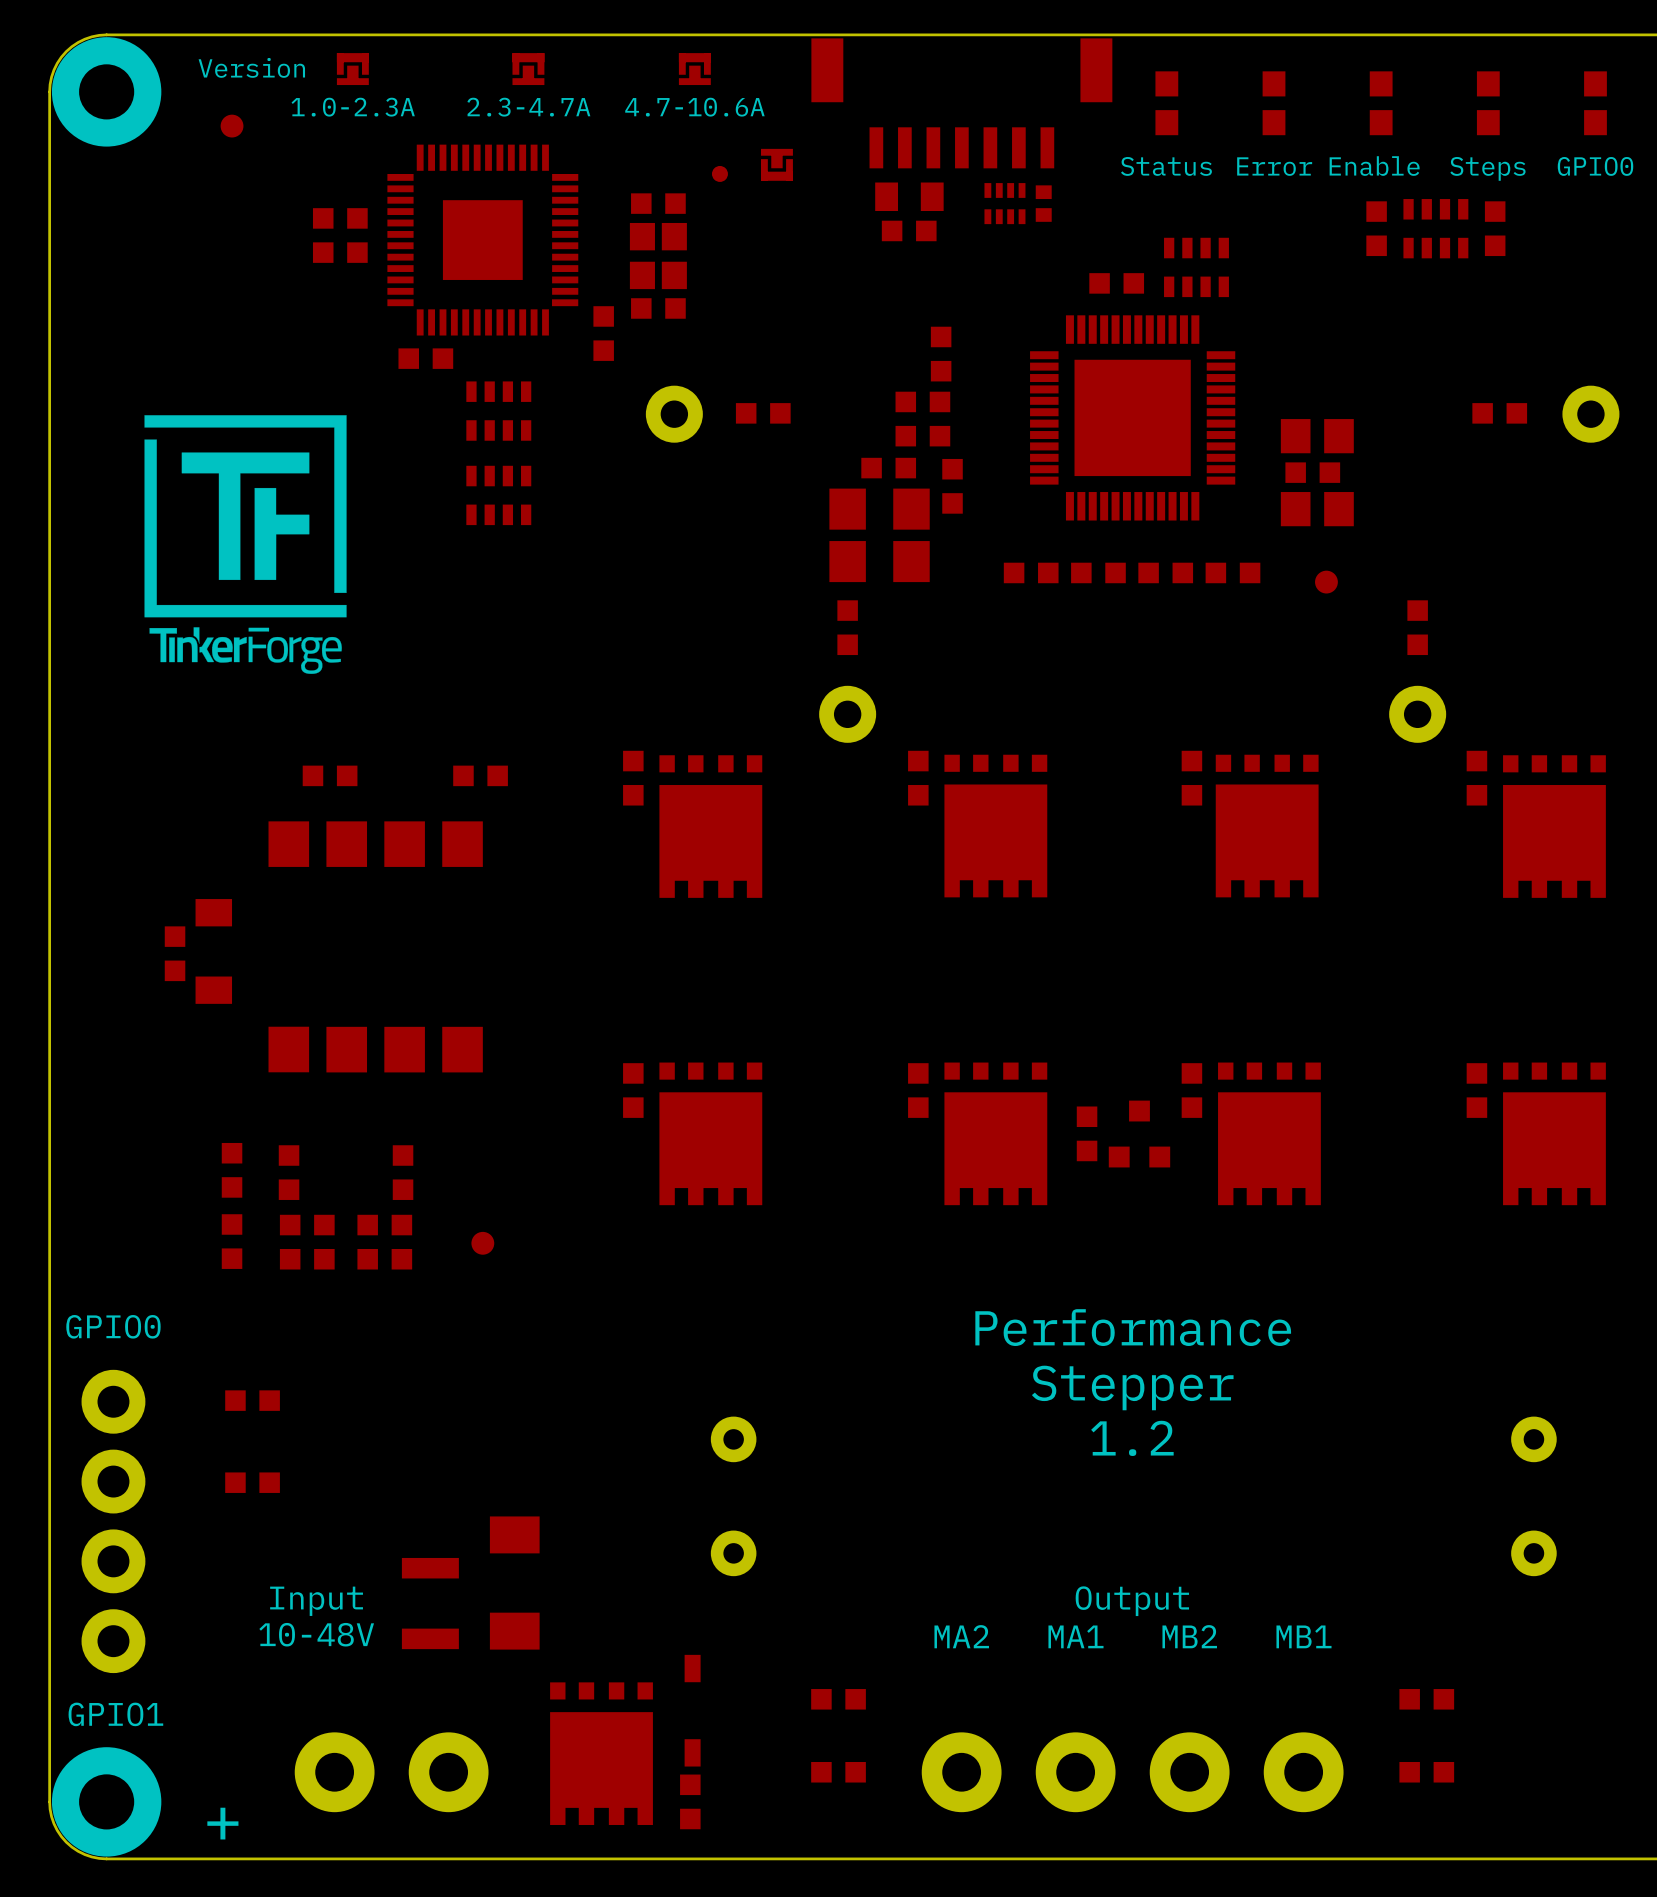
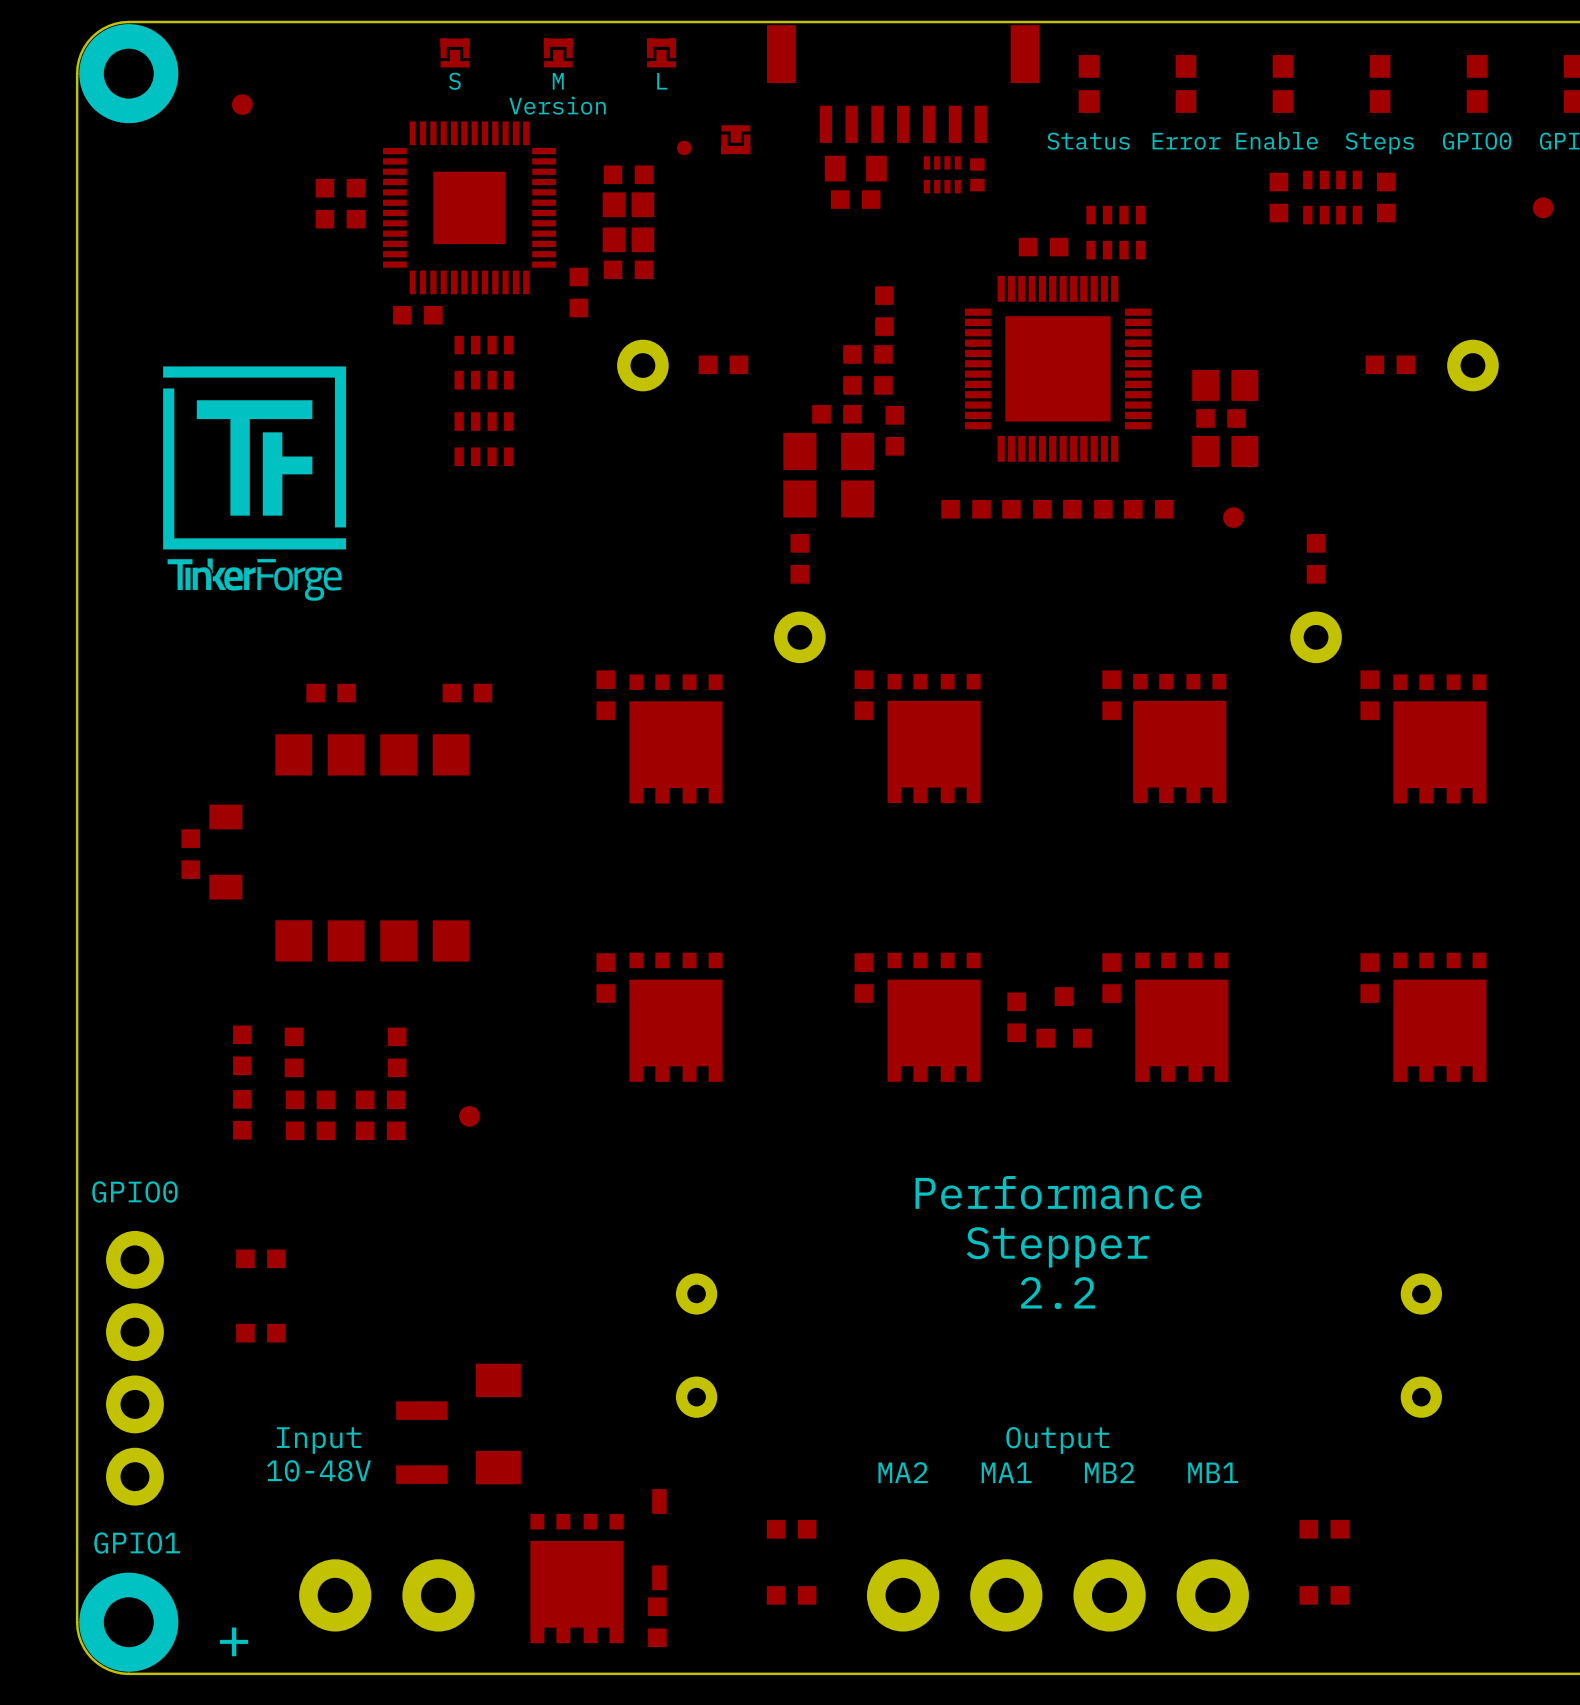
text position: Version (251, 67) -> Version (557, 105)
part: (352, 69) -> none
part: none -> (455, 52)
part: (528, 69) -> none
part: none -> (558, 52)
text: none -> S (454, 81)
text: none -> M (558, 81)
text: 1.0-2.3A (353, 107) -> none
text: 2.3-4.7A (528, 107) -> none
text: 4.7-10.6A (694, 107) -> L (662, 81)
text: 1.2 (1132, 1438) -> 2.2 (1057, 1293)

